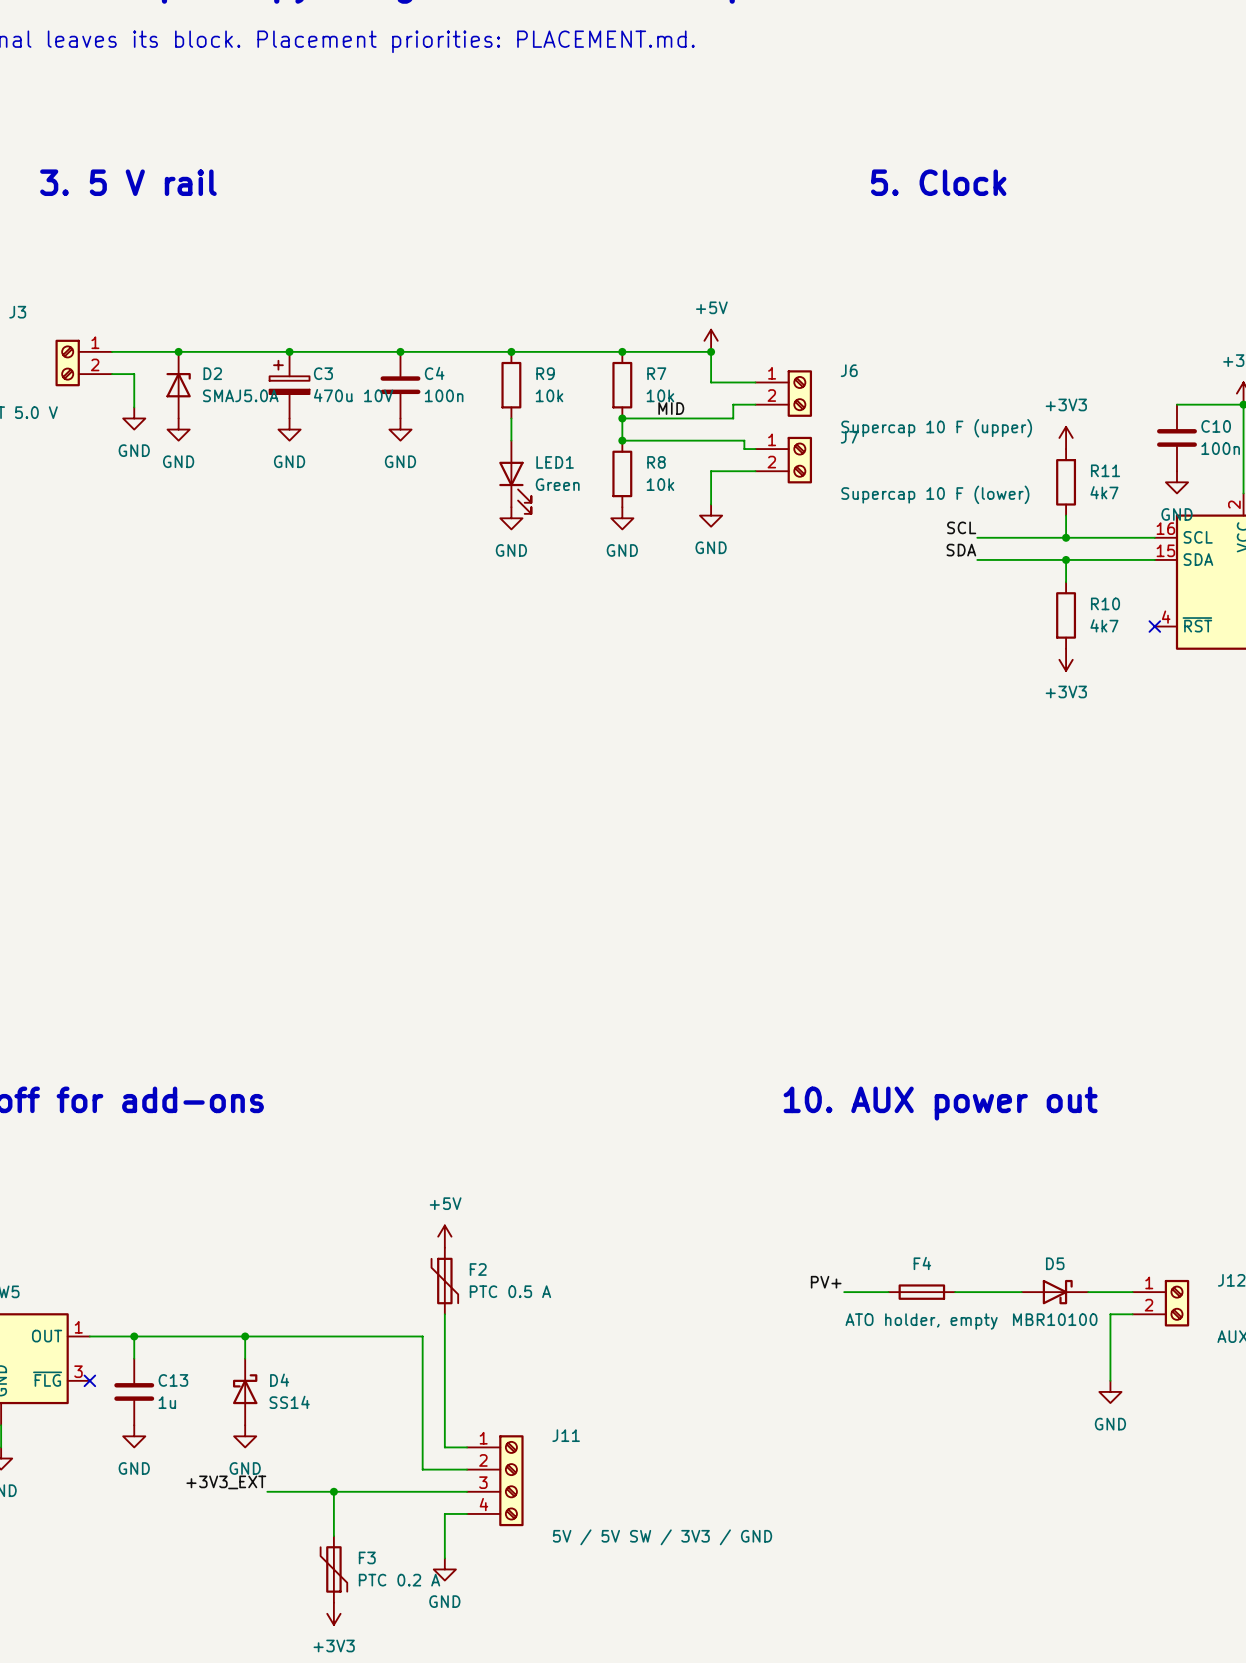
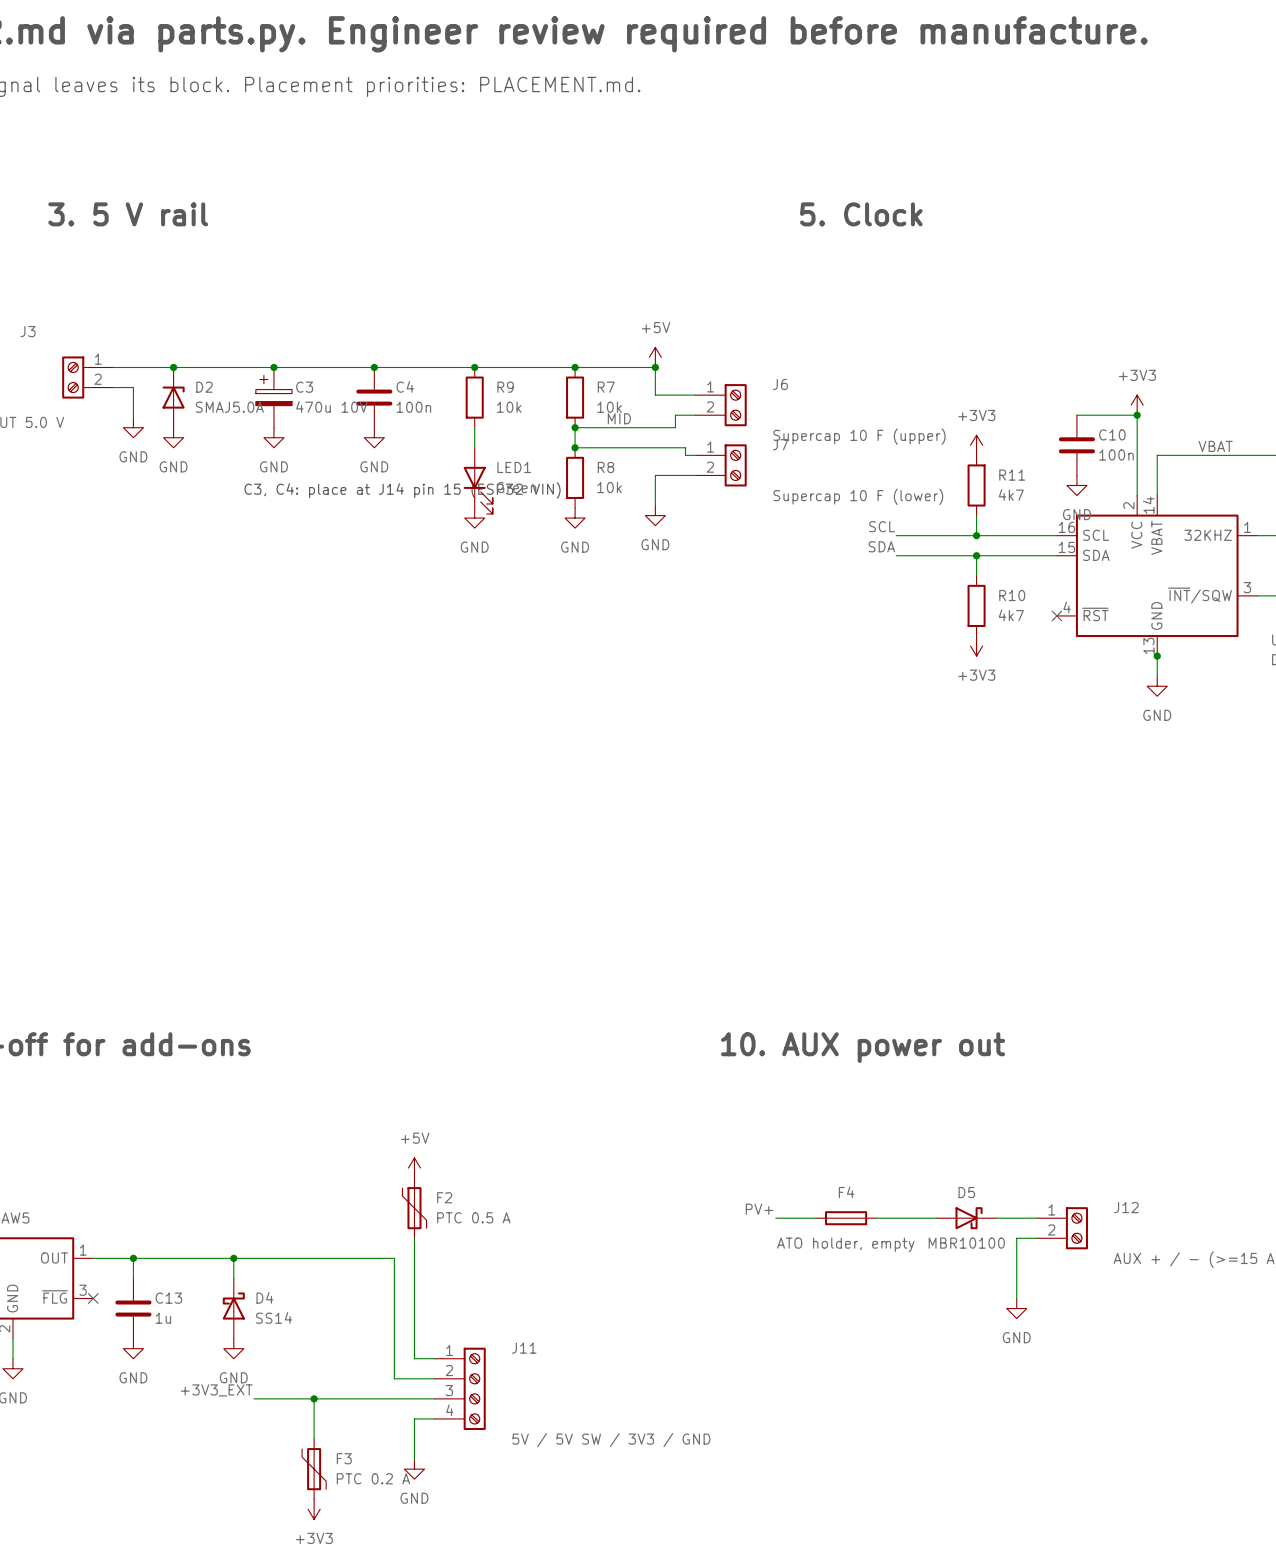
text: none -> C3, C4: place at J14 pin 15 (ESP32 VIN) (402, 490)

